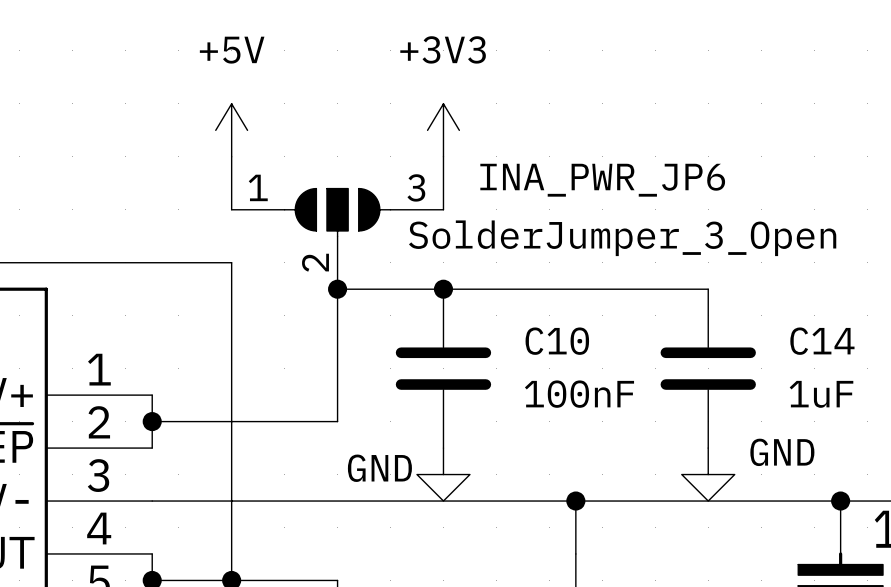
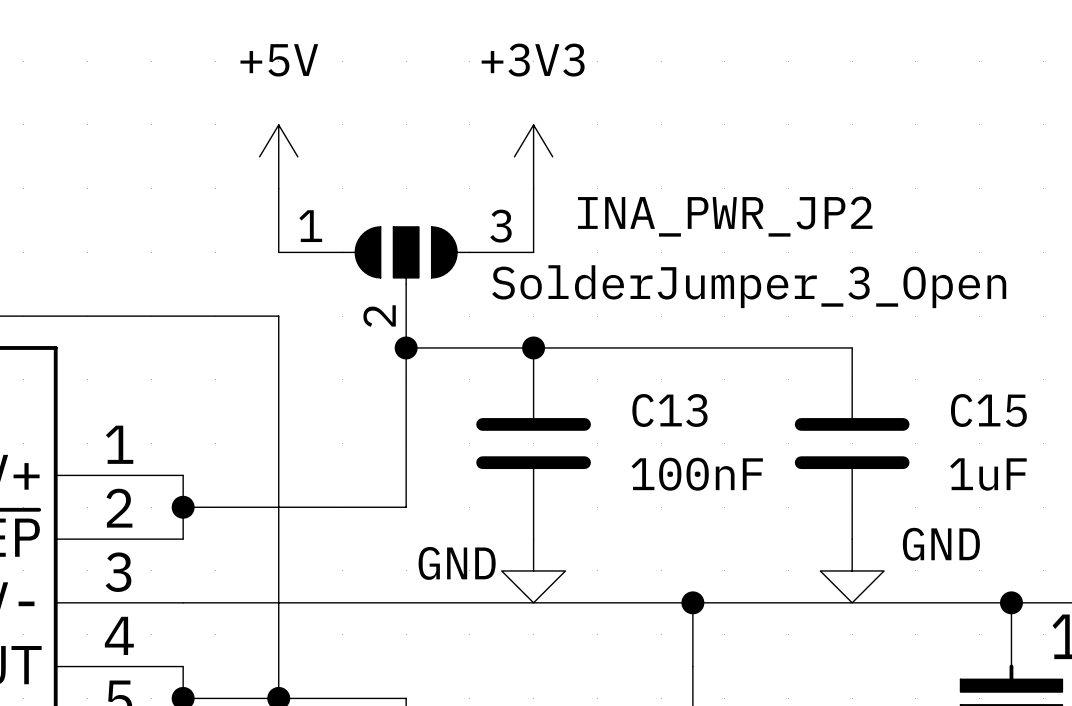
INA_PWR_JP6 name: INA_PWR_JP6 (602, 180) -> INA_PWR_JP2 (725, 216)
C10 name: C10 (557, 341) -> C13 (669, 410)
C14 name: C14 (822, 341) -> C15 (988, 410)

